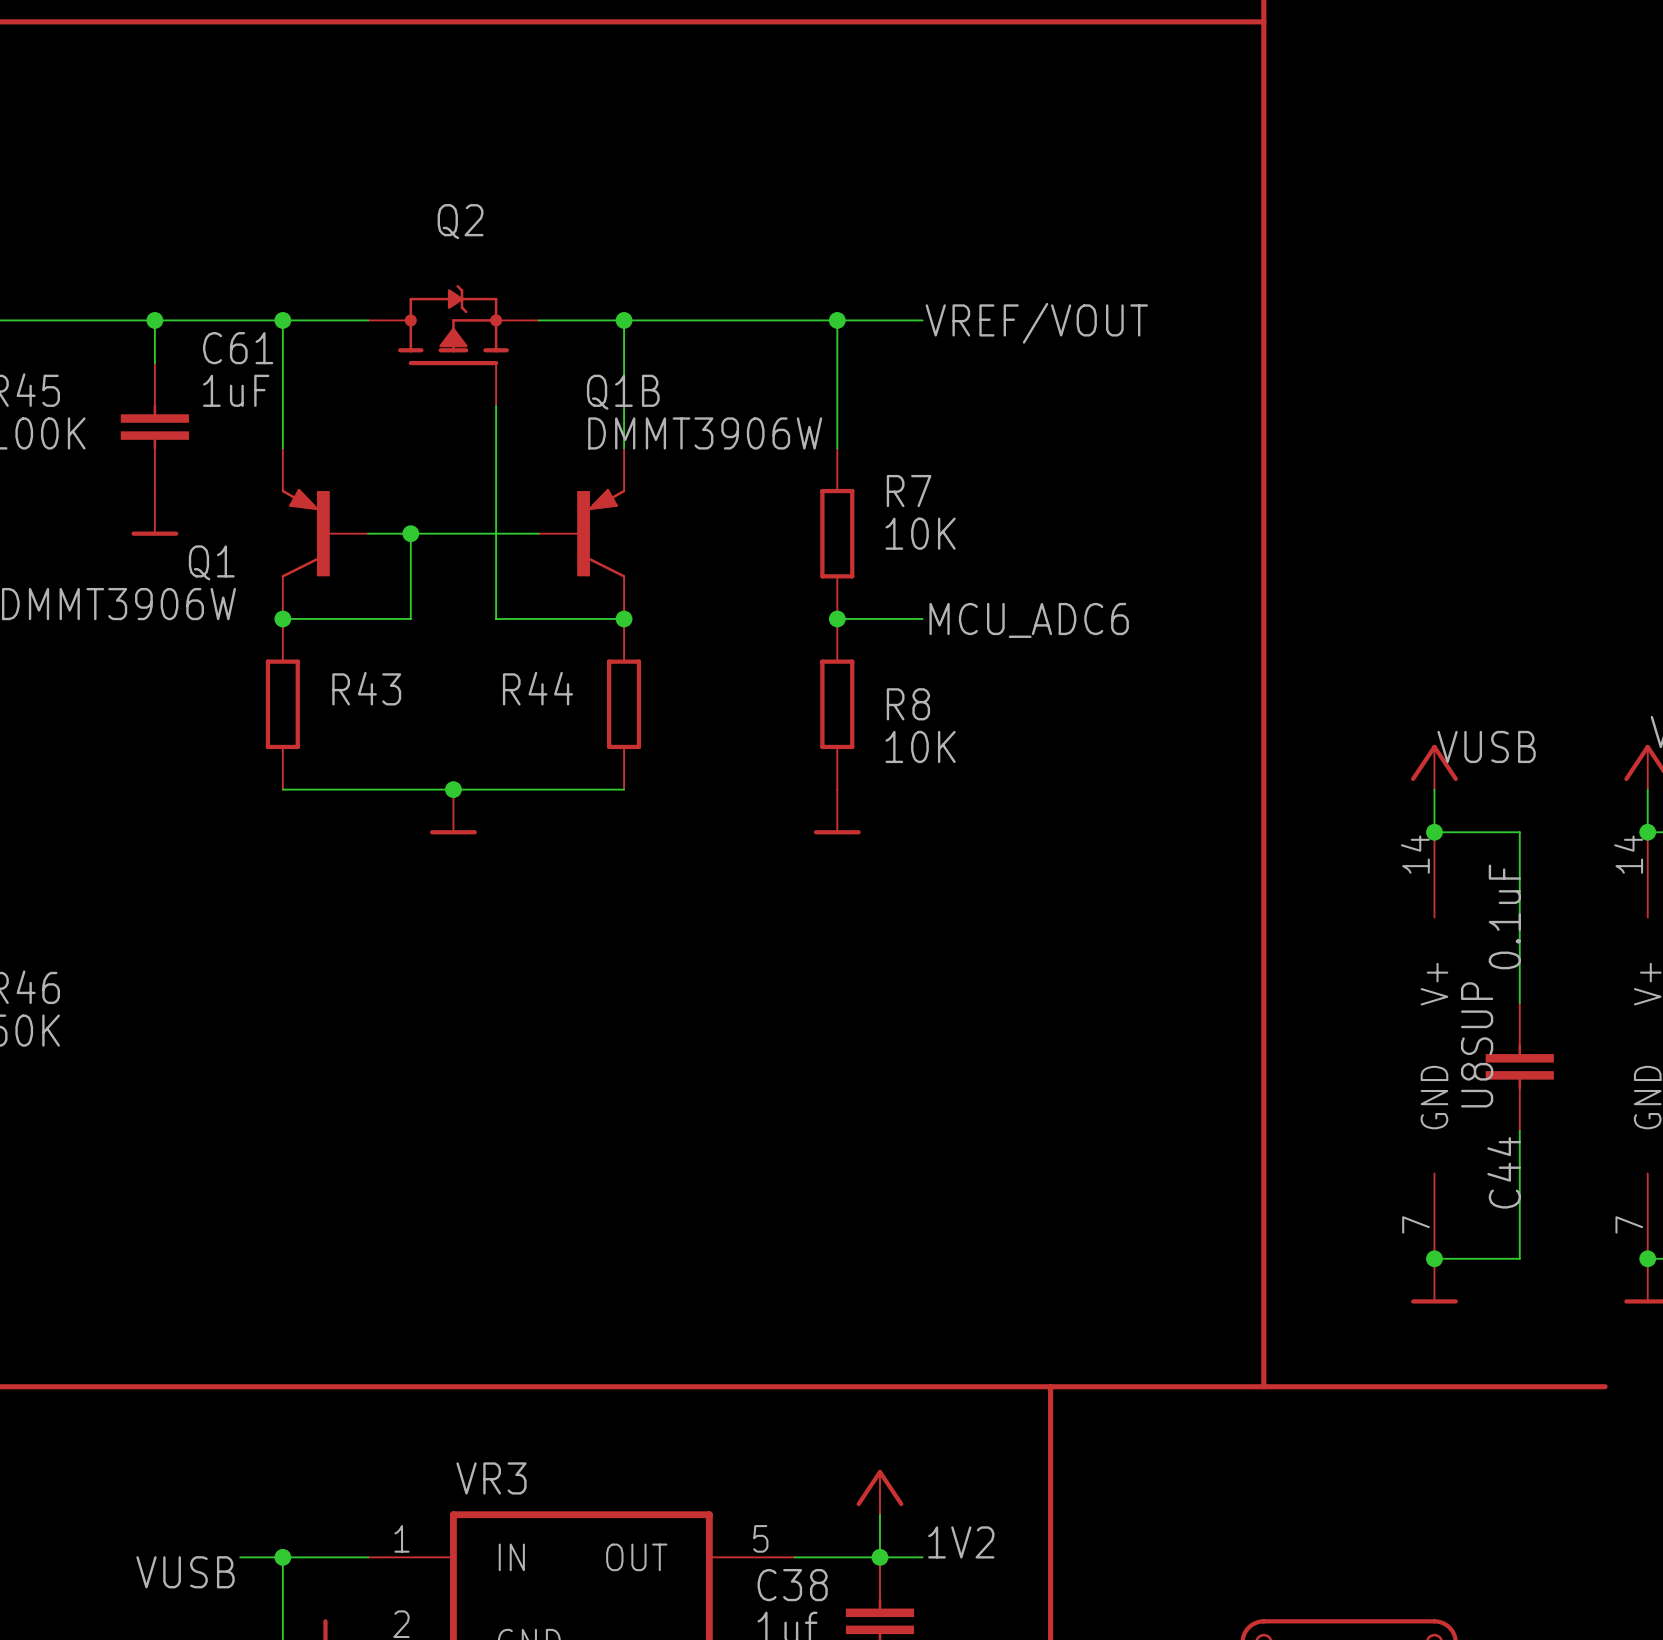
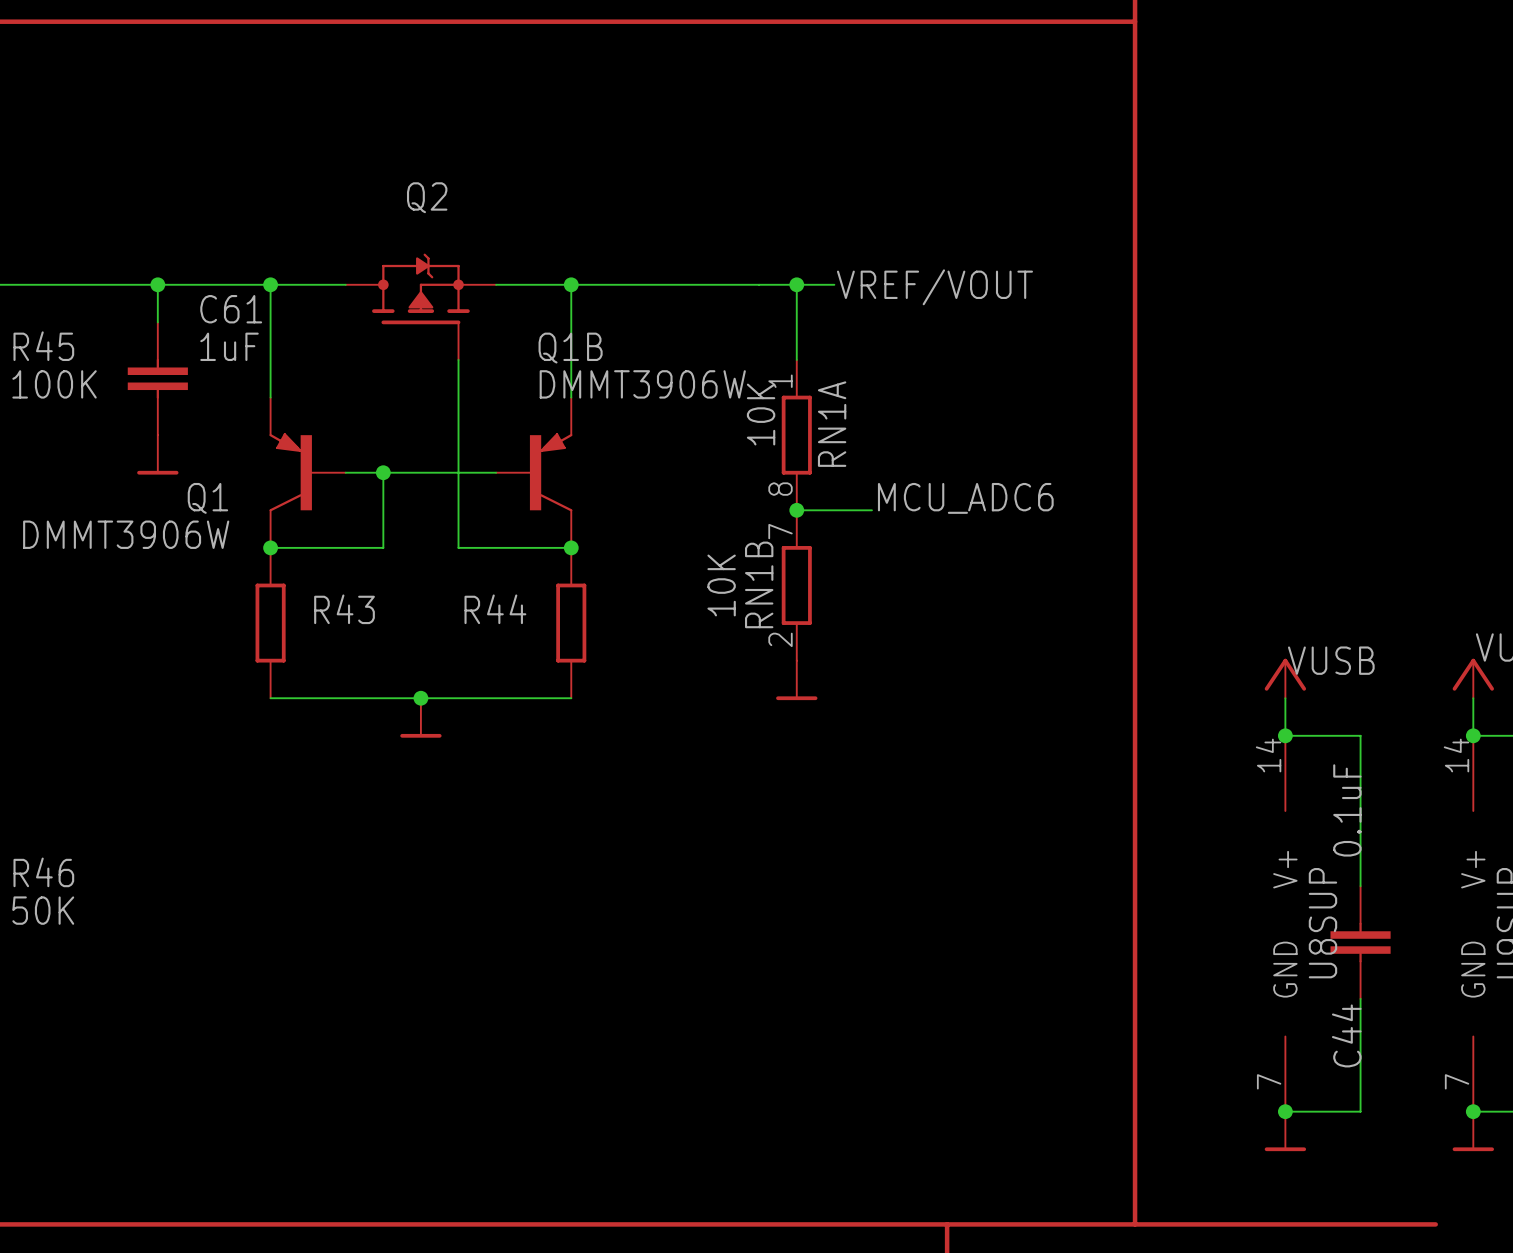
wire: (837, 320) (837, 448) -> none
junction position: (837, 320) -> (796, 284)
wire: none -> (796, 284) (796, 359)
RN1A: none -> 10K (796, 435)
R7: 10K (837, 533) -> none
wire: (837, 618) (922, 618) -> (796, 510) (871, 510)
junction position: (837, 618) -> (796, 510)
label position: MCU_ADC6 (1029, 620) -> MCU_ADC6 (965, 498)
RN1B: none -> 10K (796, 585)
R8: 10K (837, 704) -> none
power symbol position: (837, 812) -> (796, 680)

